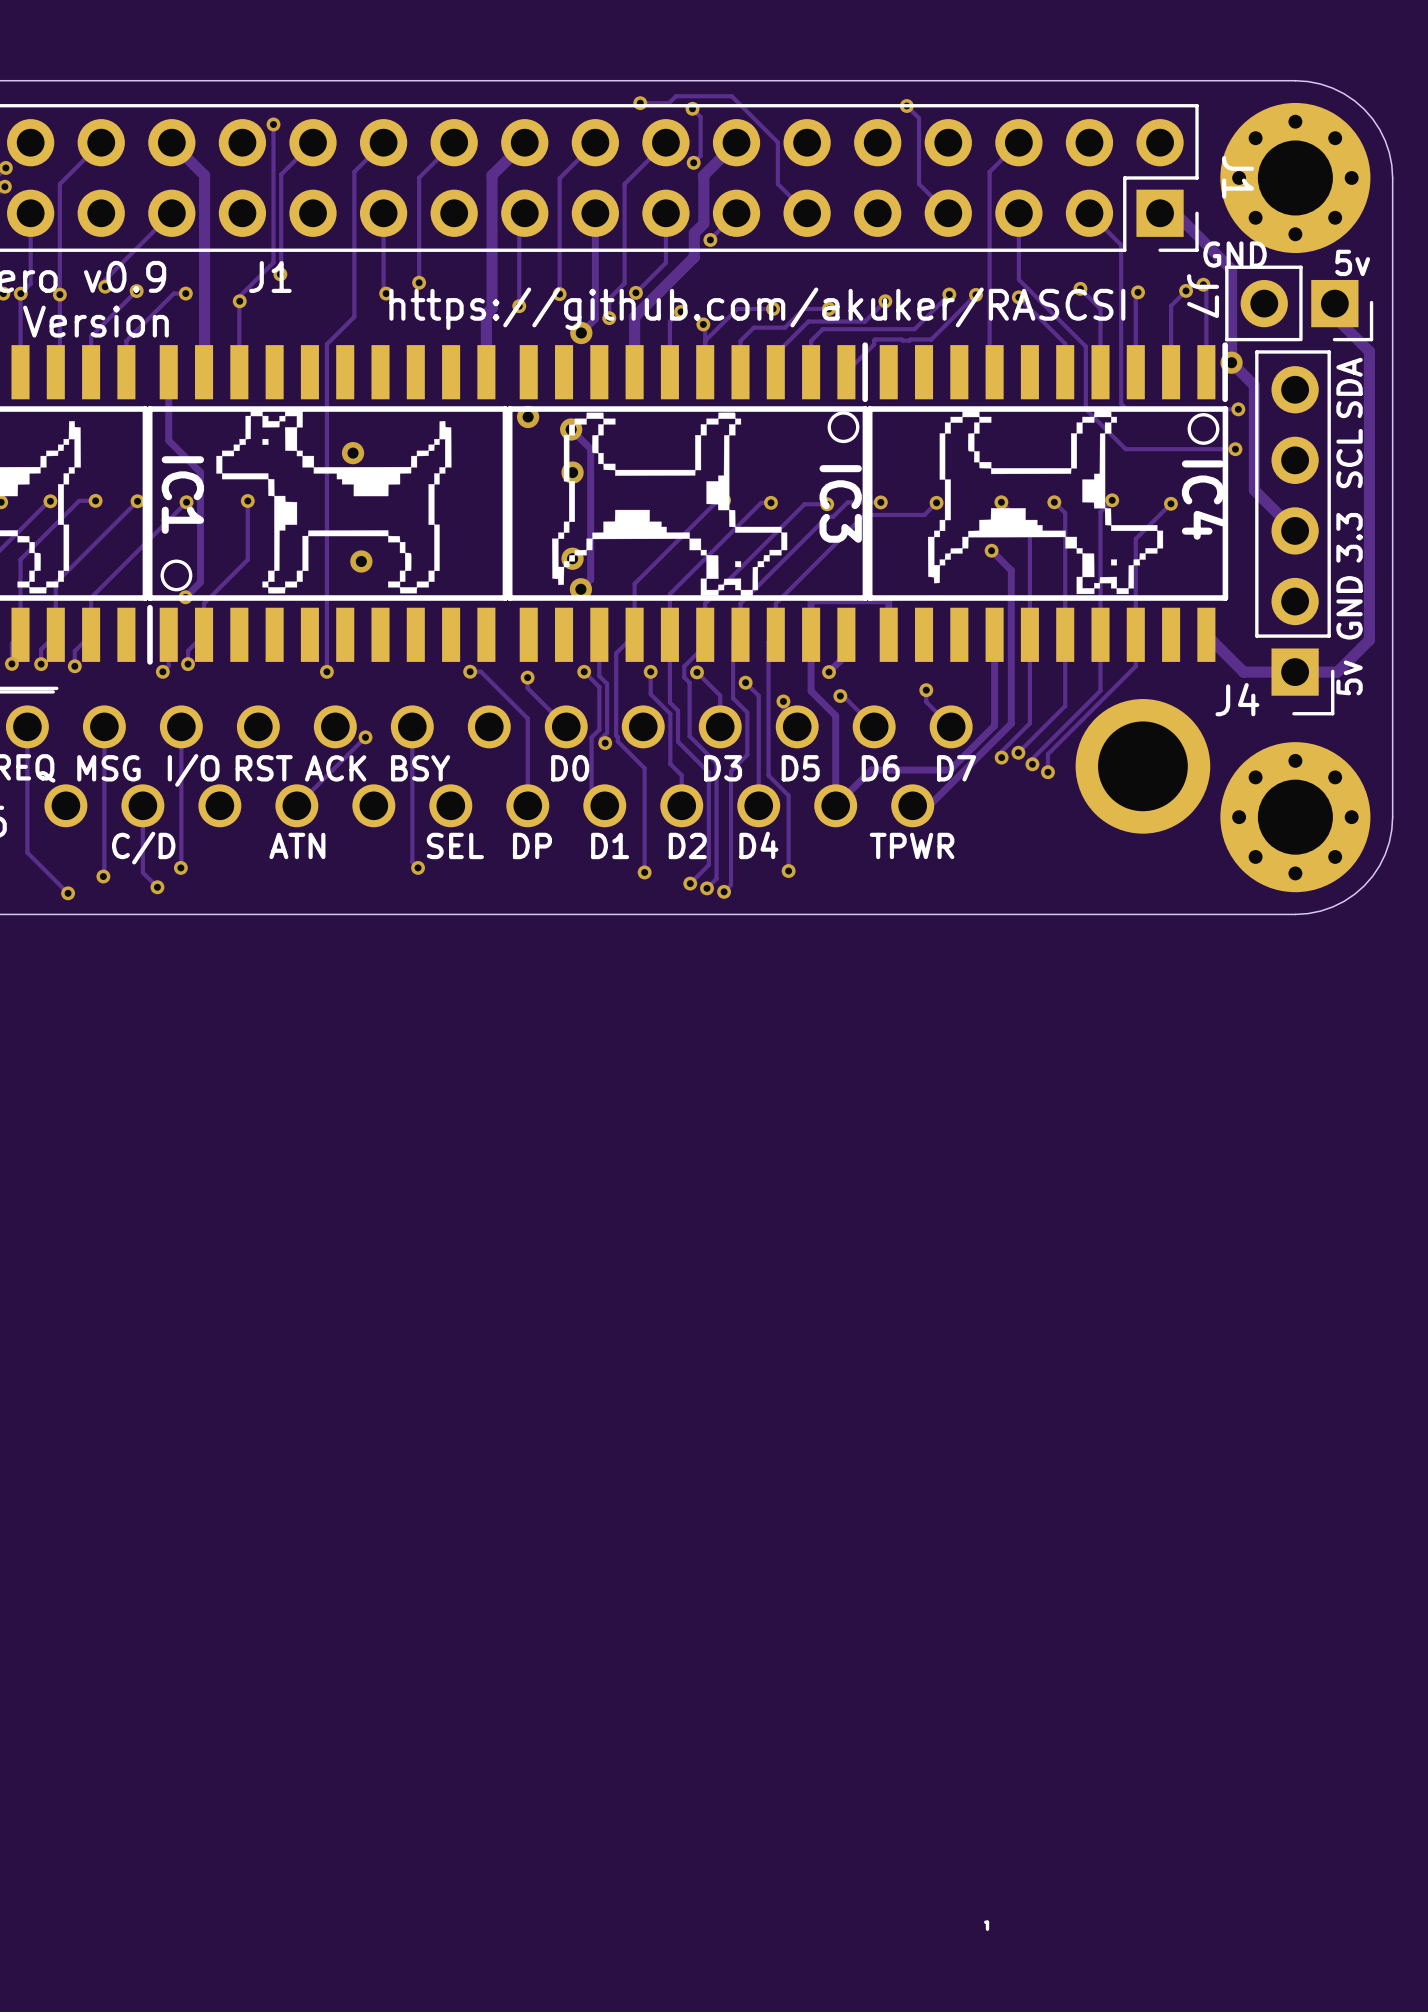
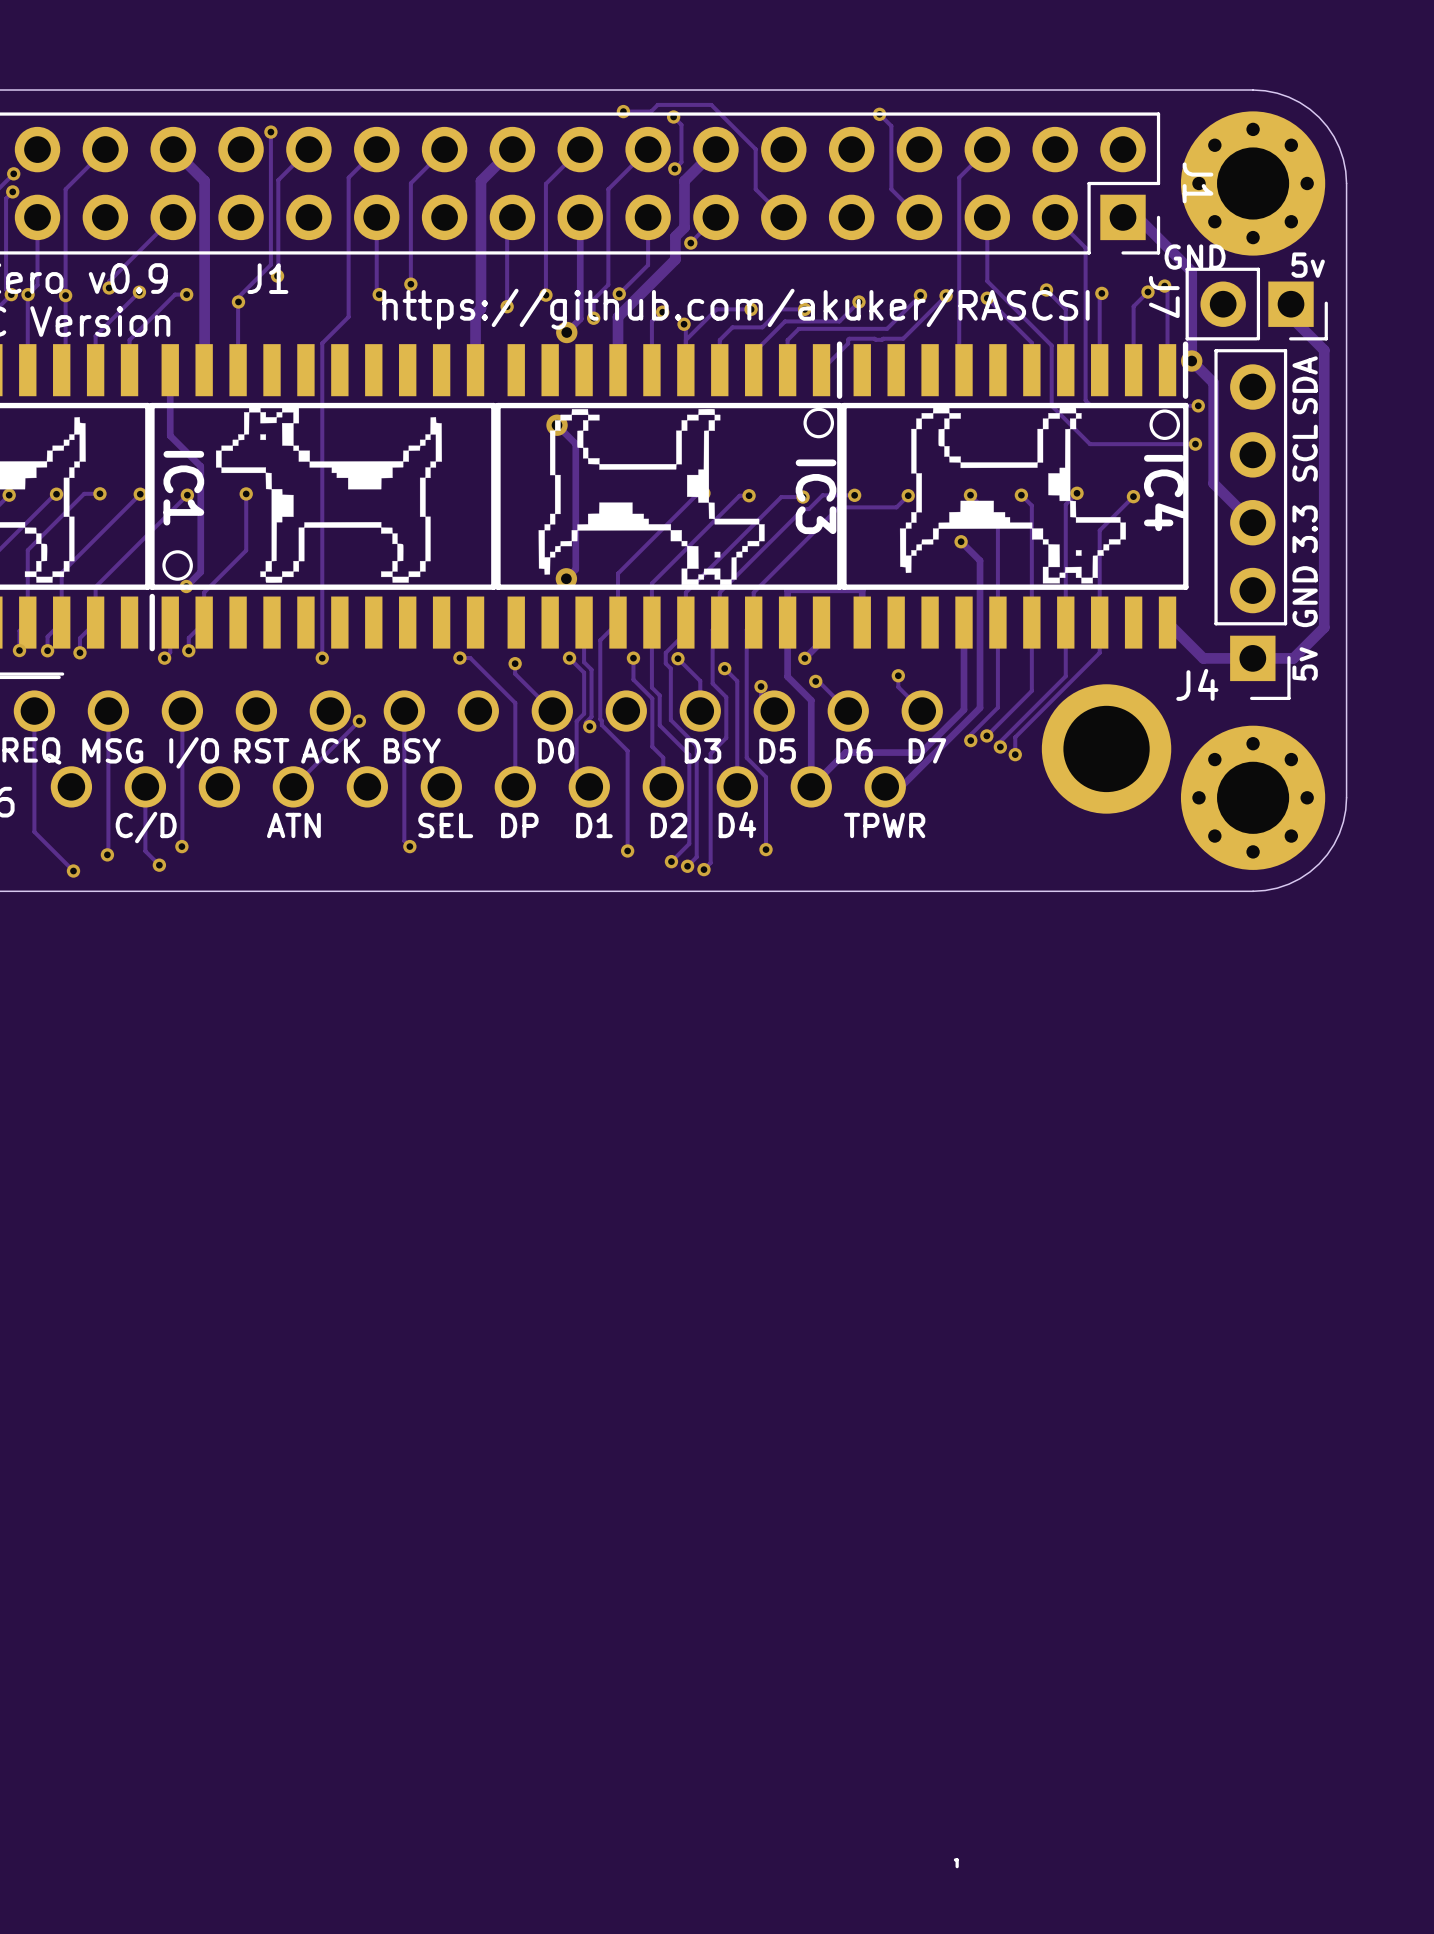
via: (528, 416) -> none
via: (353, 453) -> none
via: (572, 472) -> none
via: (572, 558) -> none
via: (361, 561) -> none

